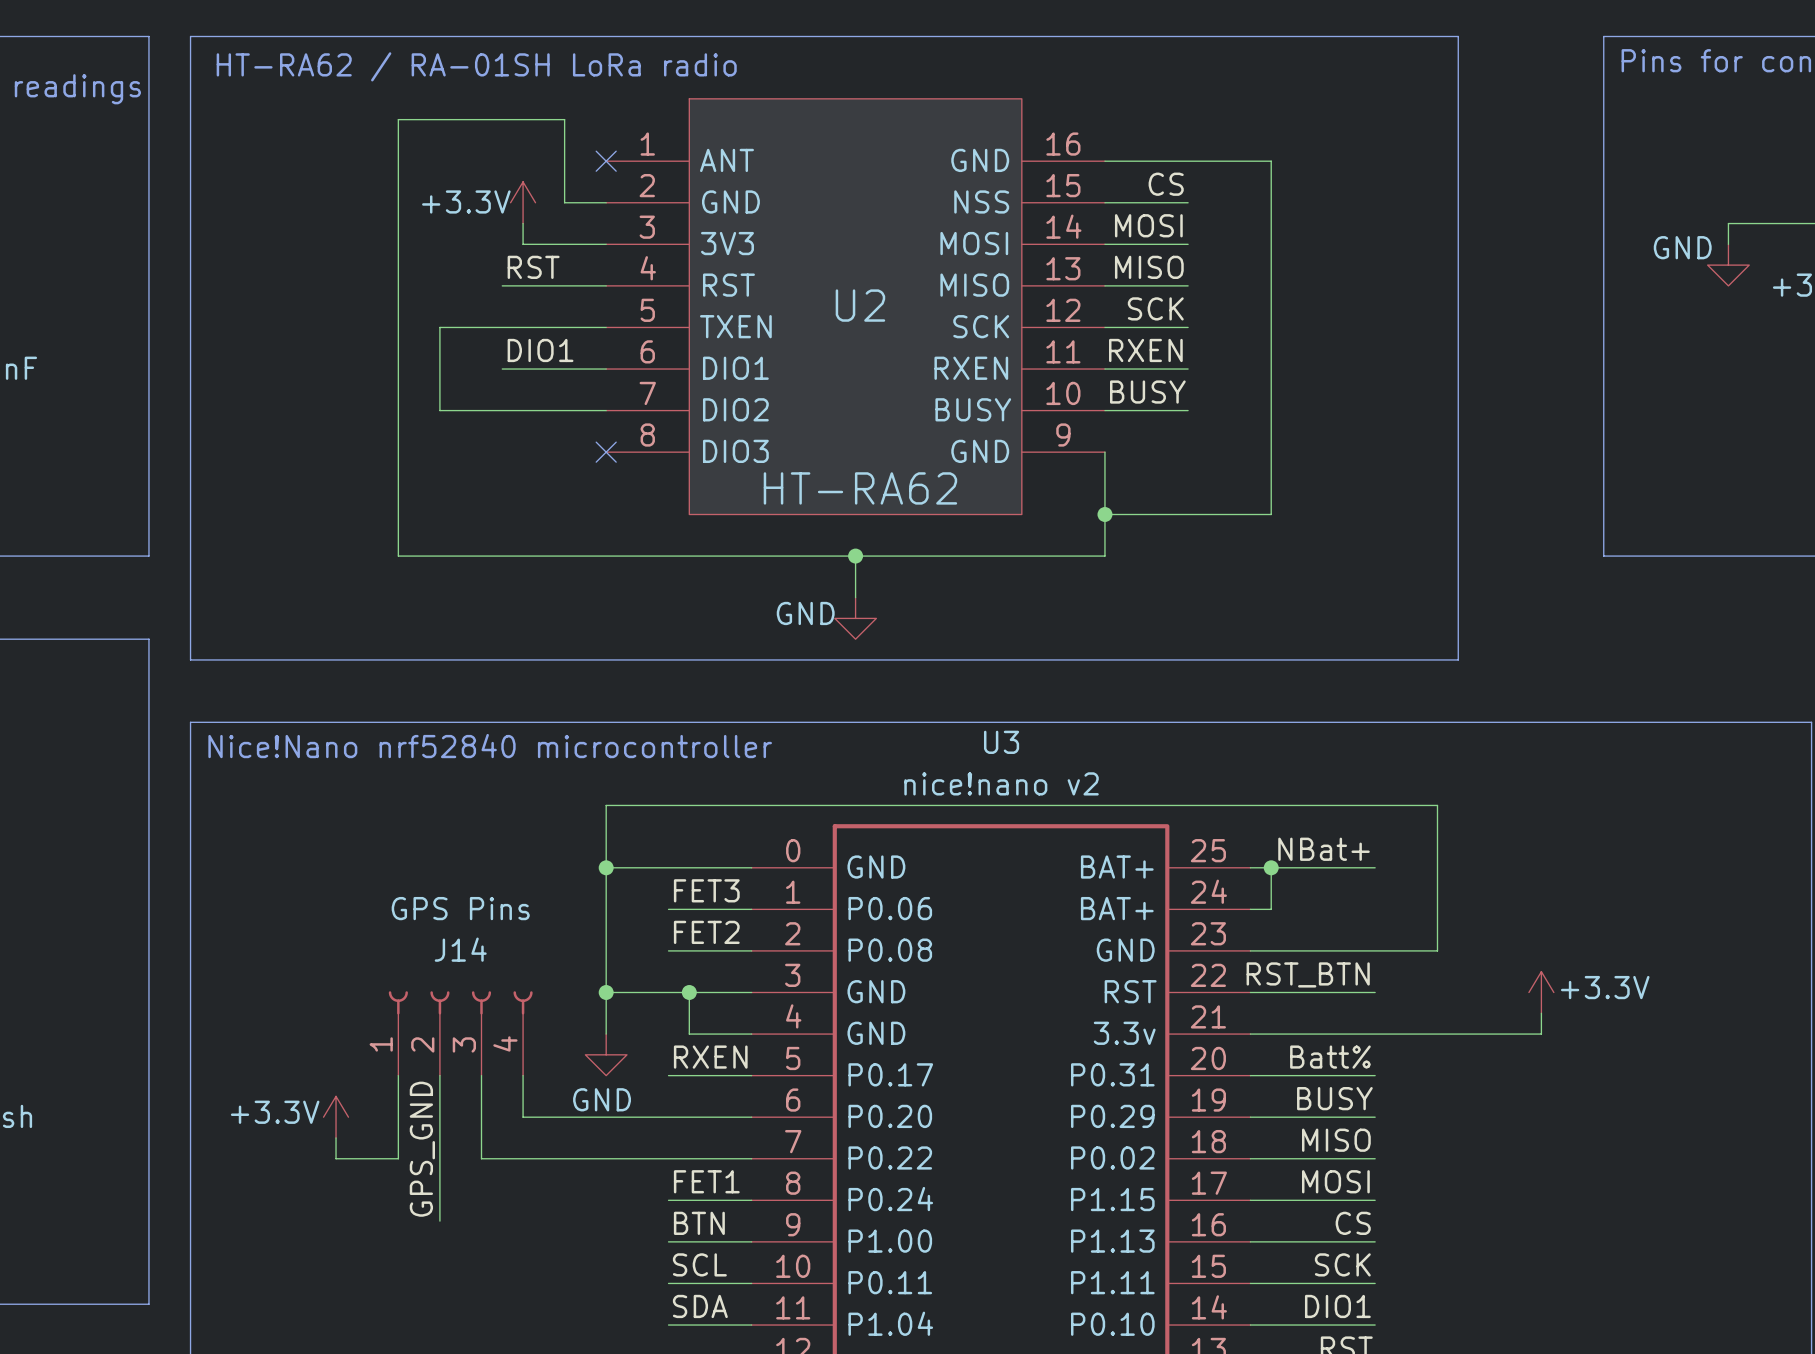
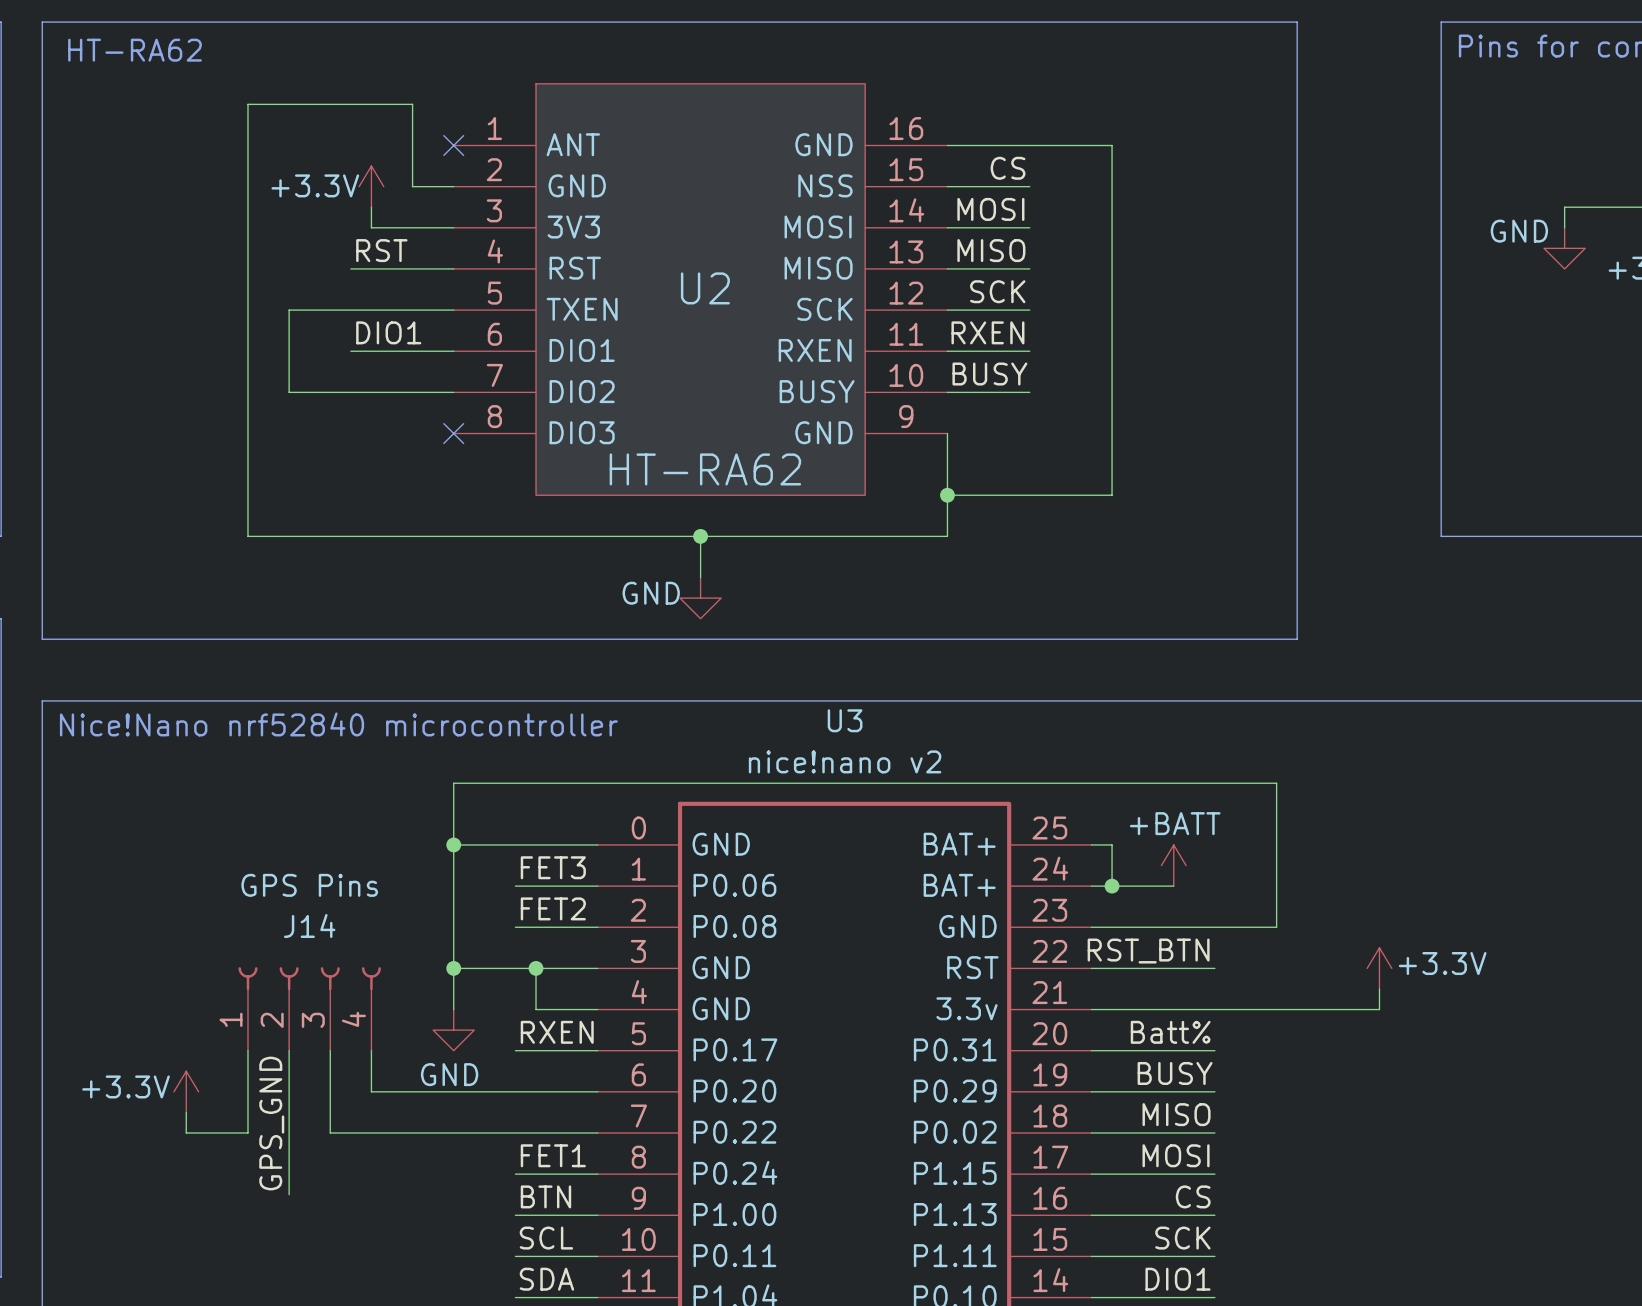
text: HT-RA62 / RA-01SH LoRa radio (476, 66) -> HT-RA62 (135, 50)
label: NBat+ (1324, 849) -> none
wire: (1271, 867) (1375, 867) -> none
junction position: (1271, 867) -> (1112, 886)
power symbol: none -> +BATT (1173, 865)
wire: none -> (1112, 886) (1173, 886)

